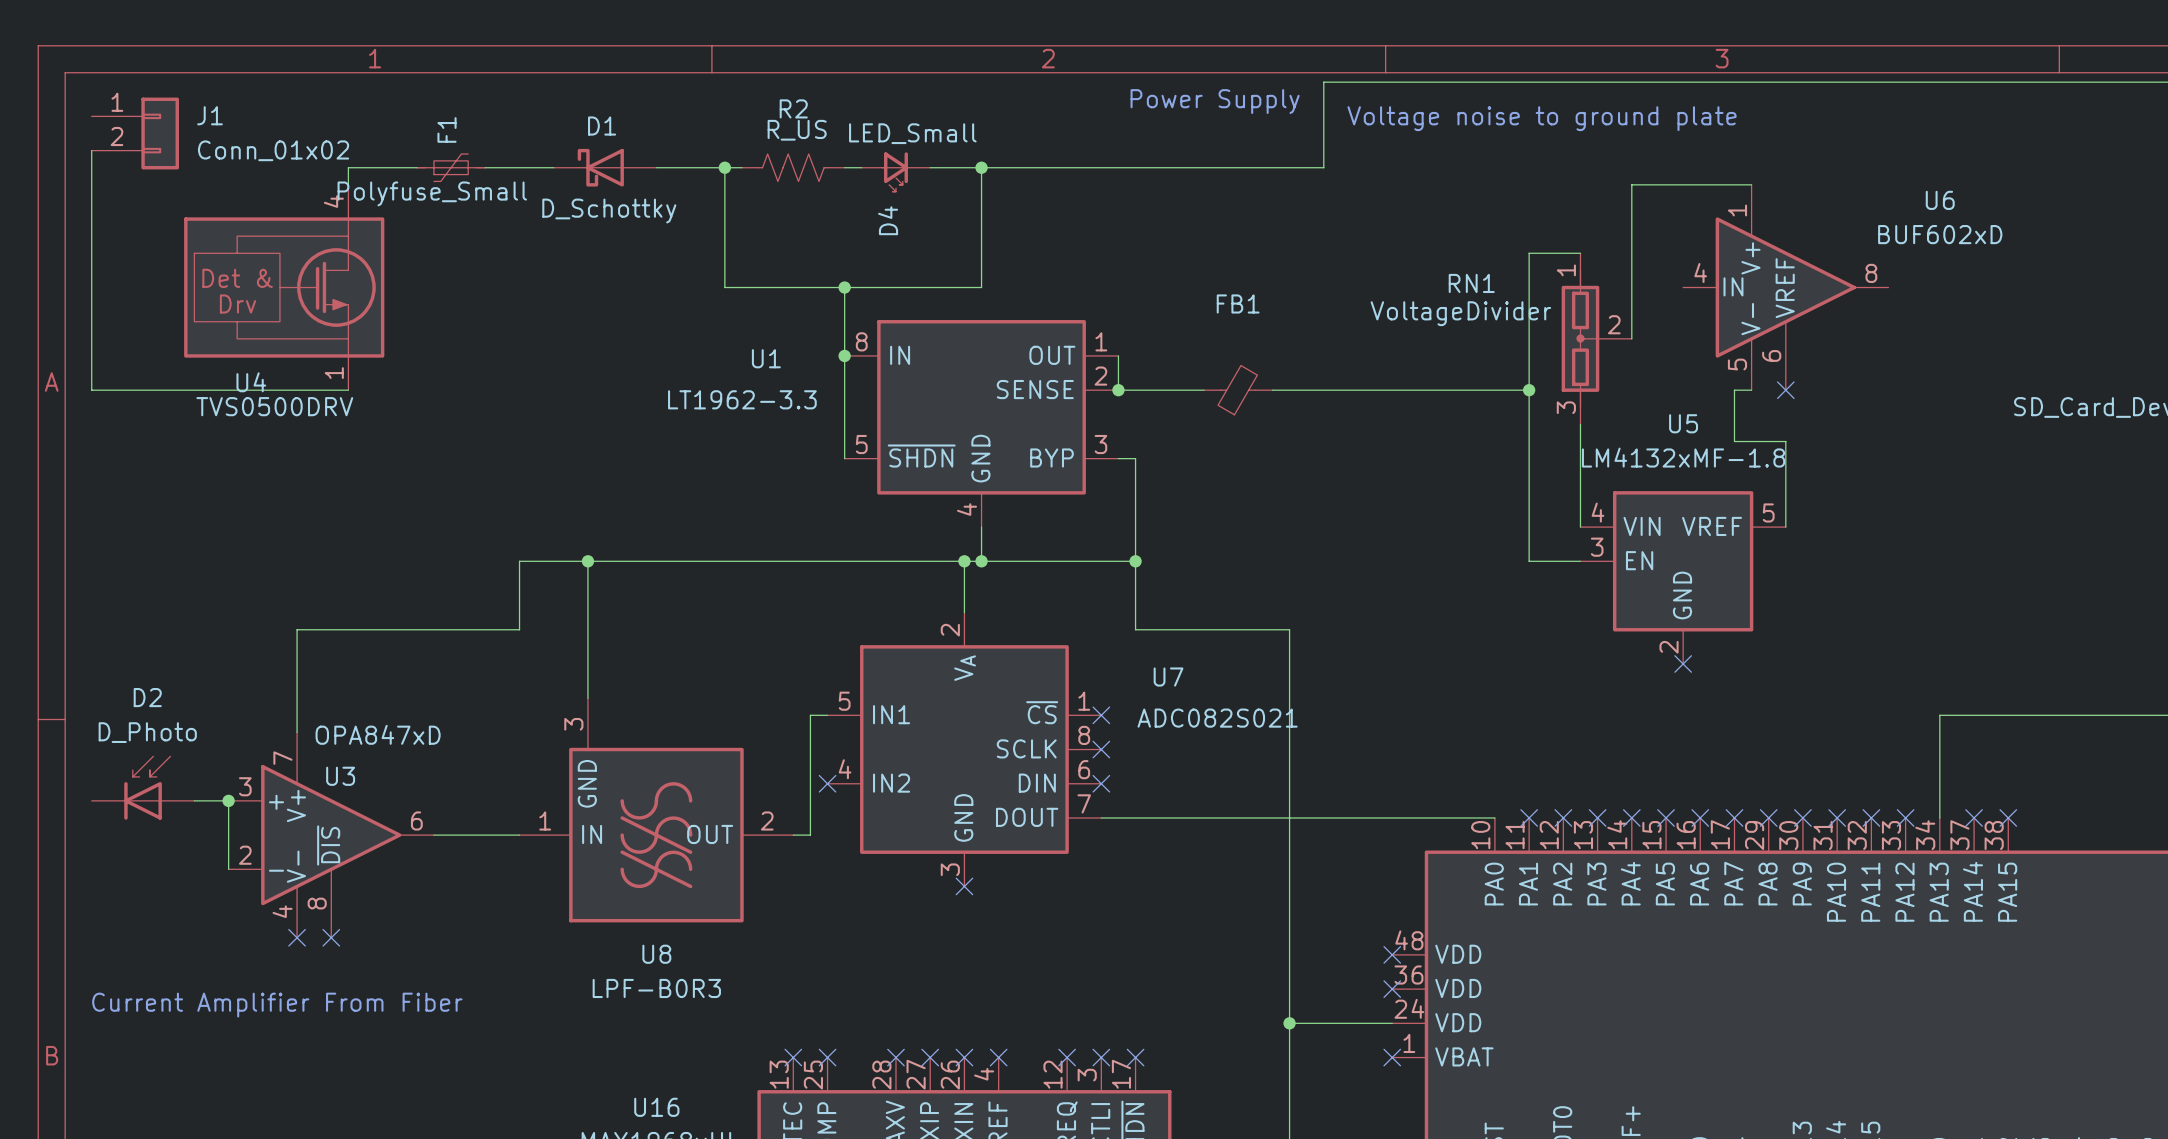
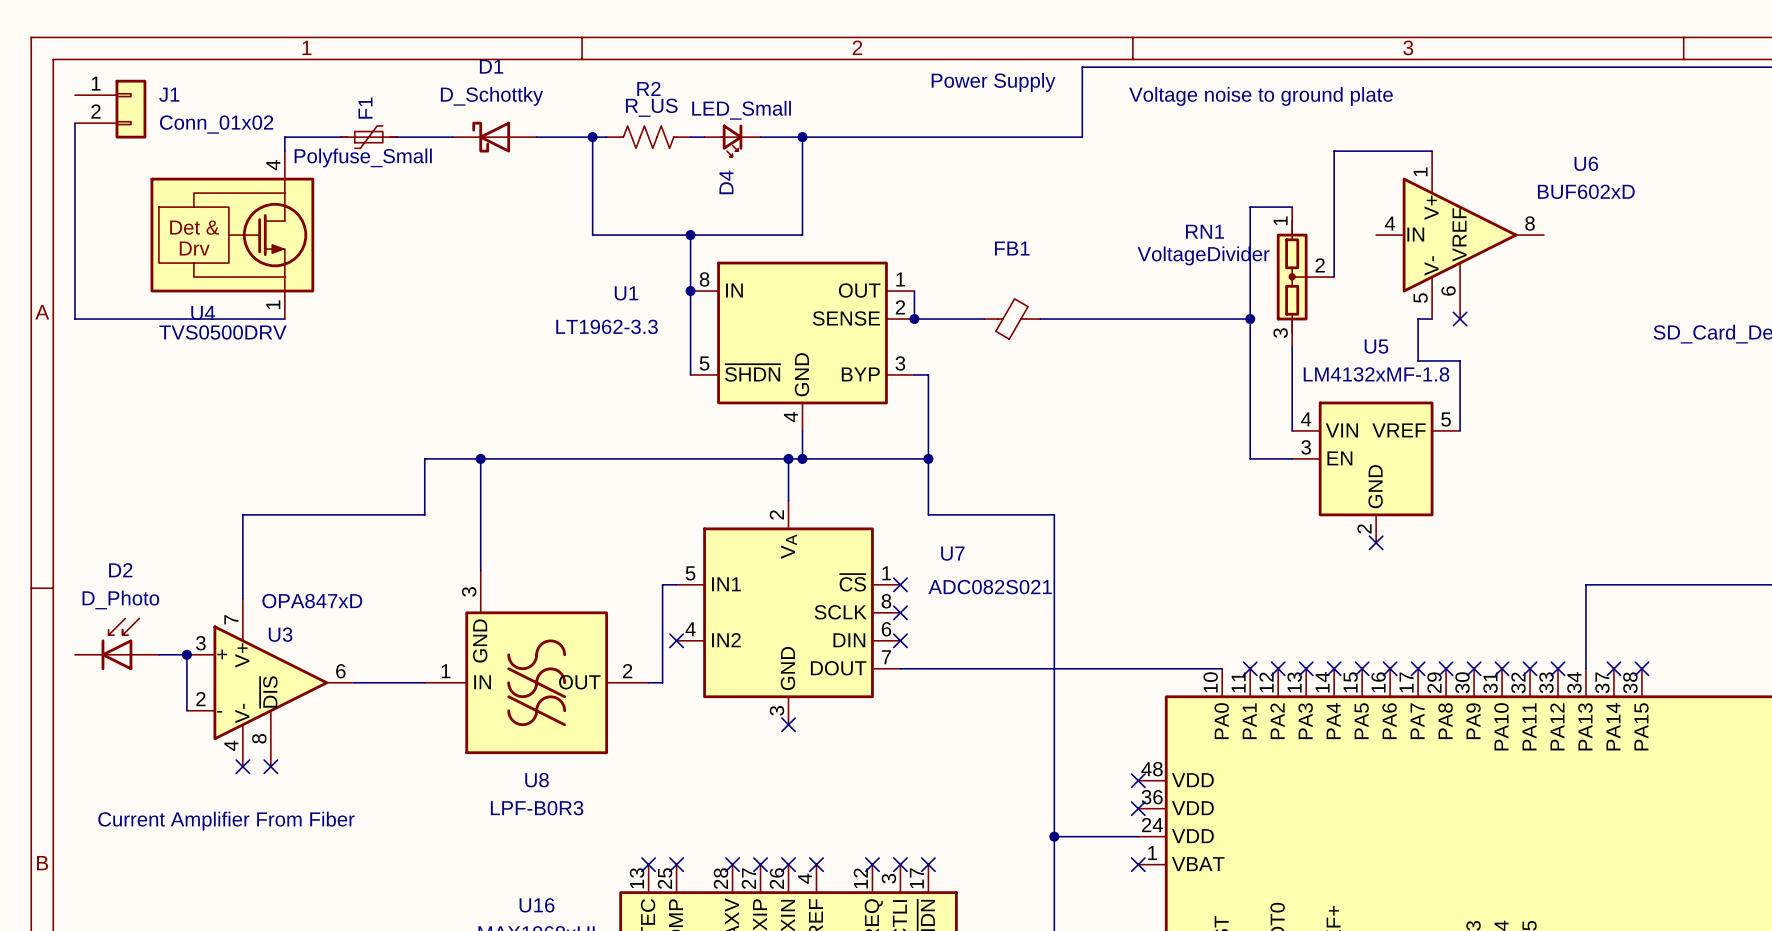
D1 name position: D1 (602, 126) -> D1 (491, 66)
D1 value position: D_Schottky (609, 211) -> D_Schottky (492, 96)

